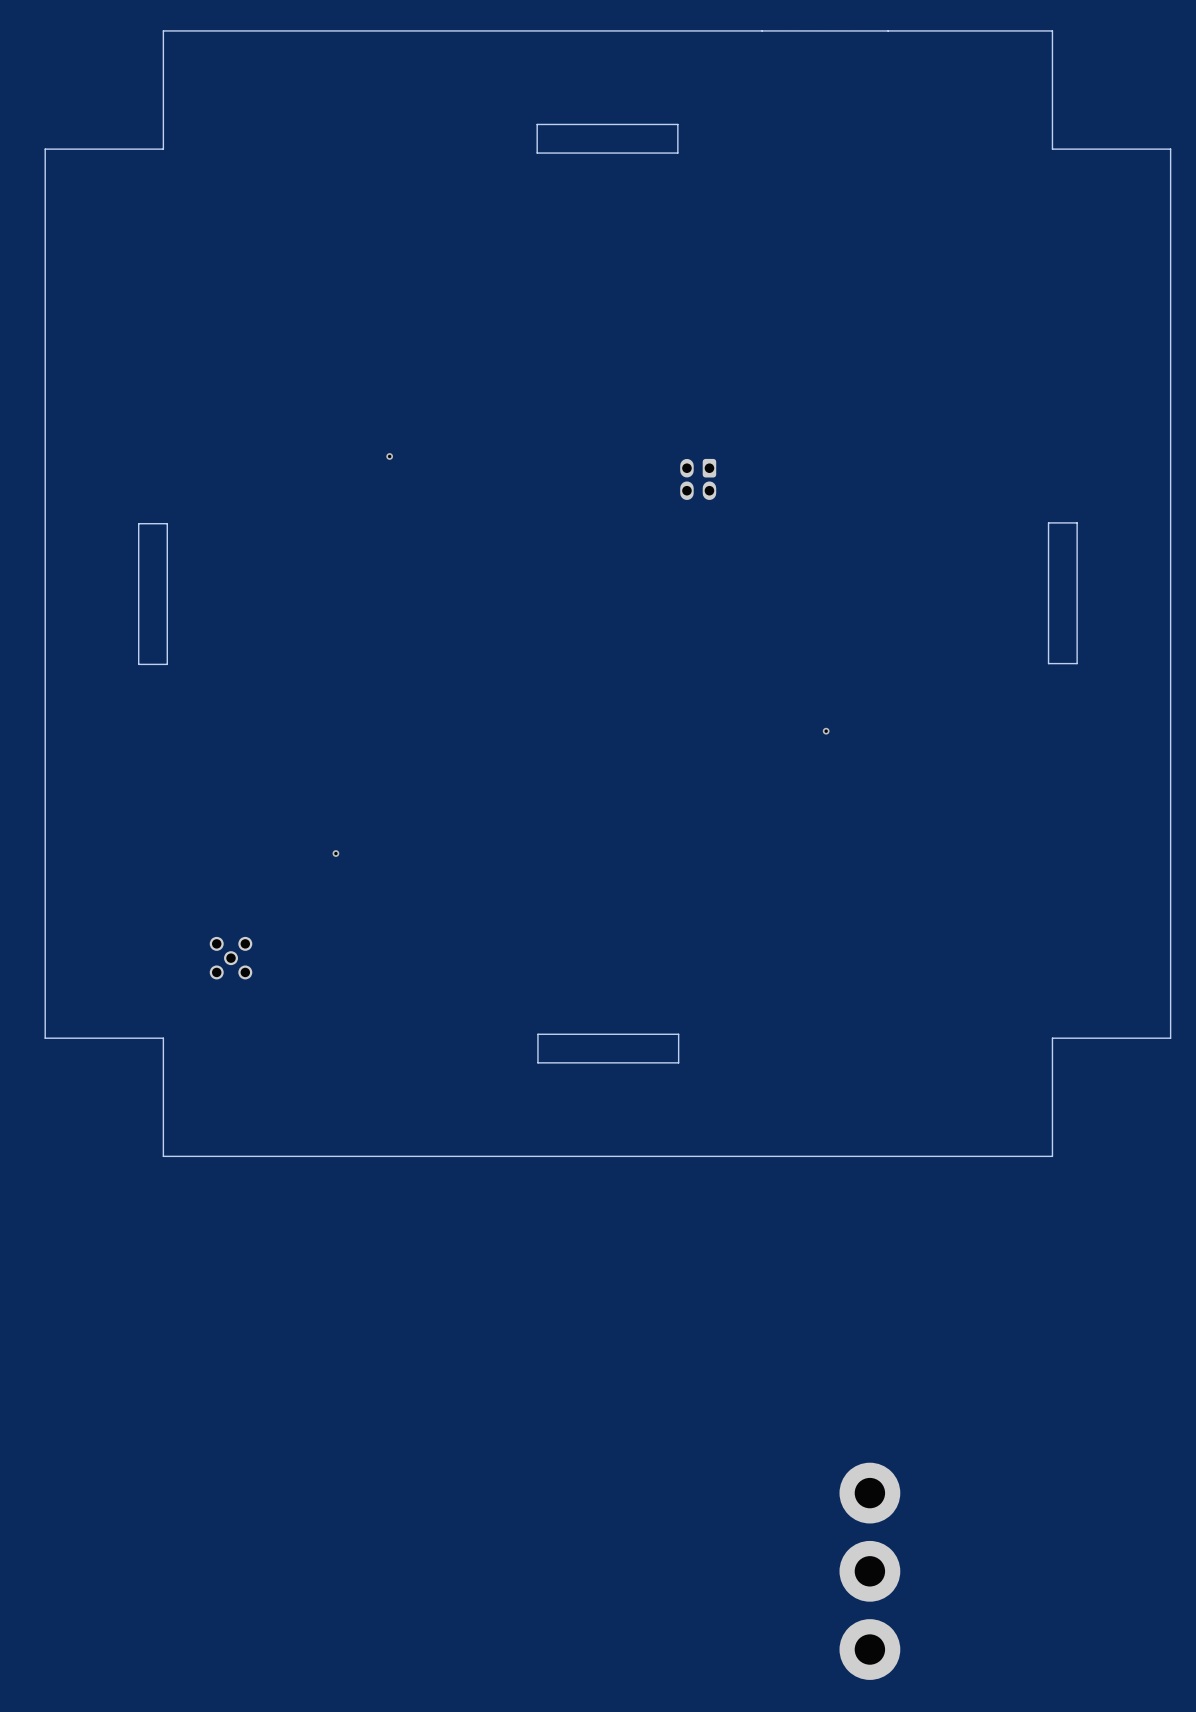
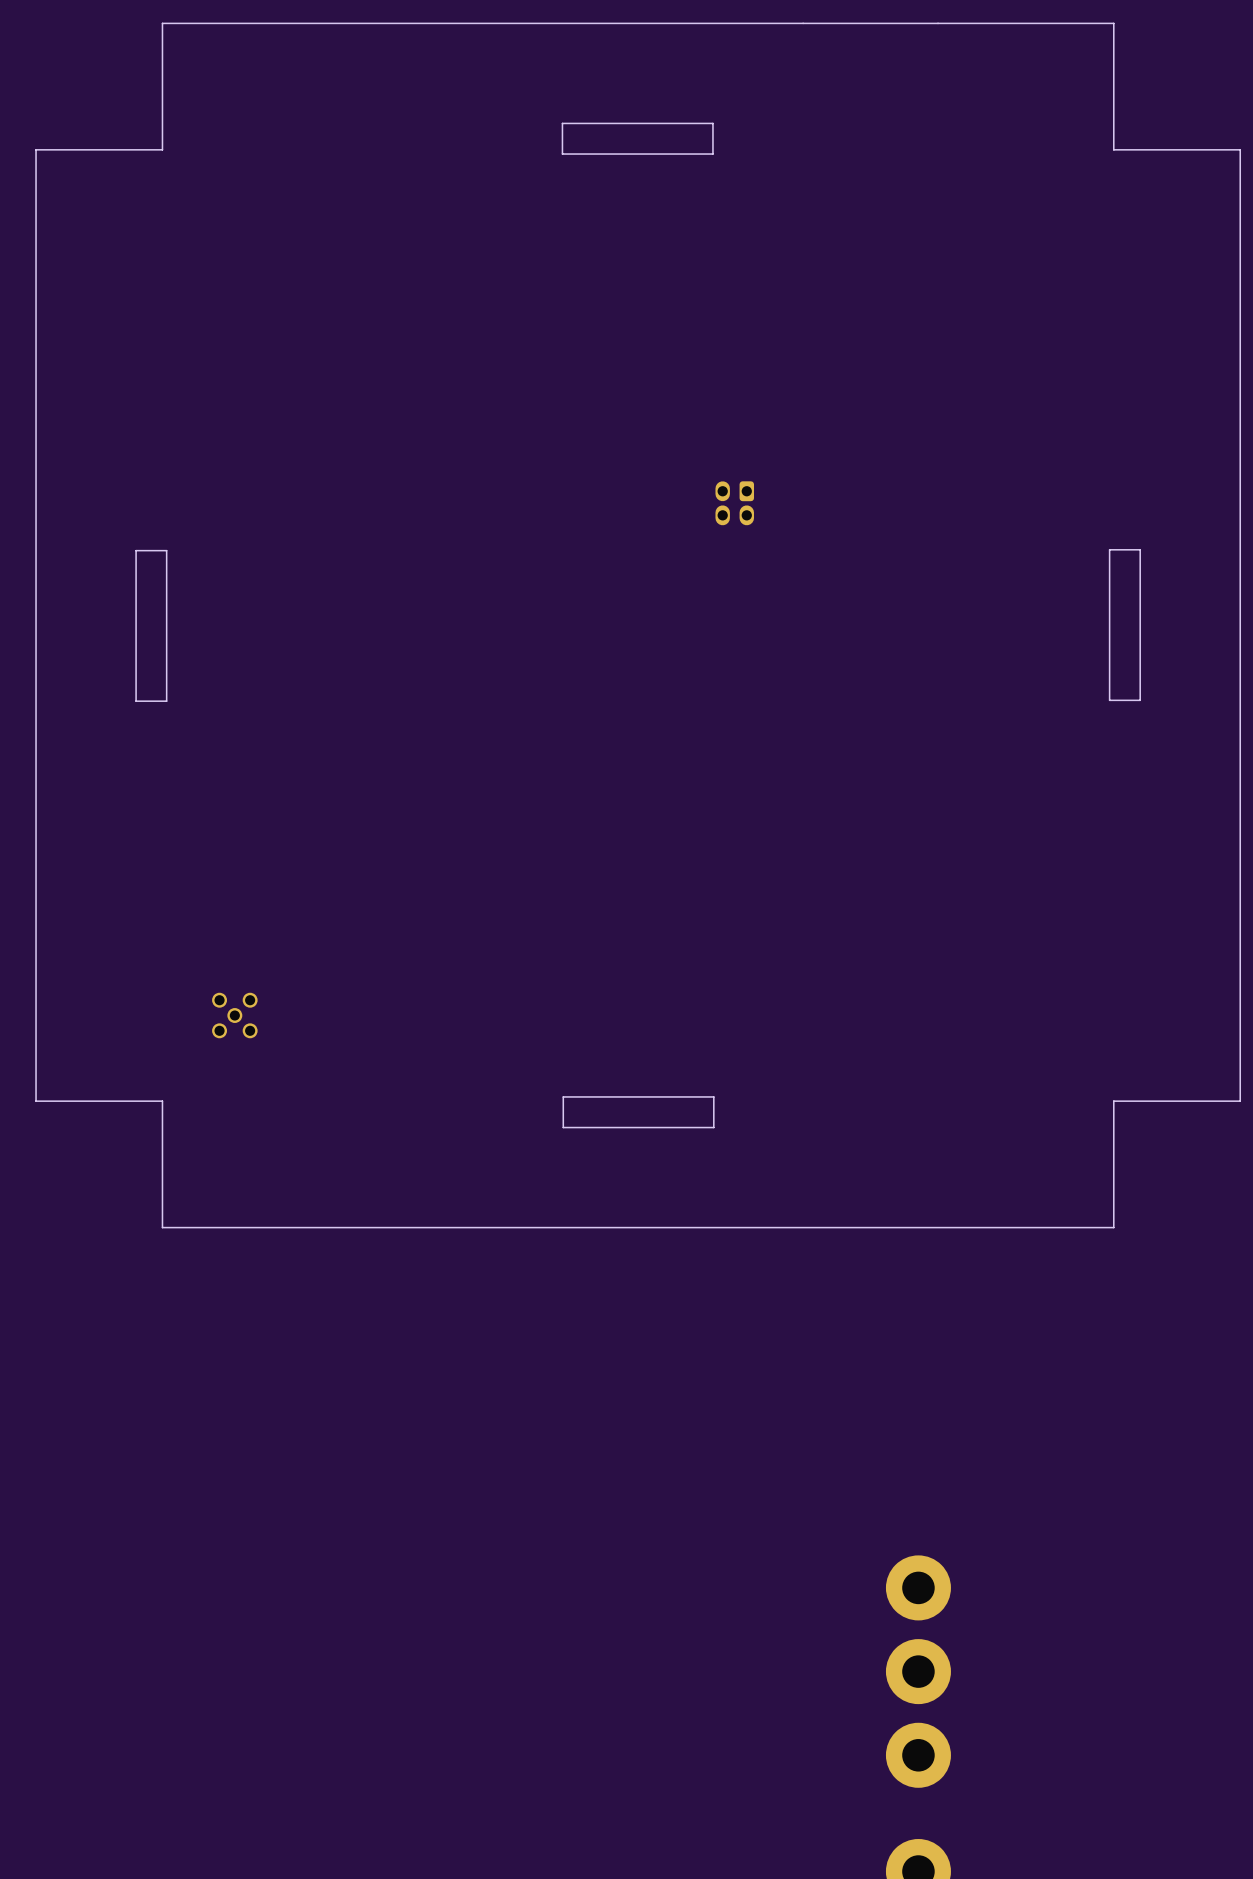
via: (389, 456) -> none
via: (826, 731) -> none
via: (335, 853) -> none

